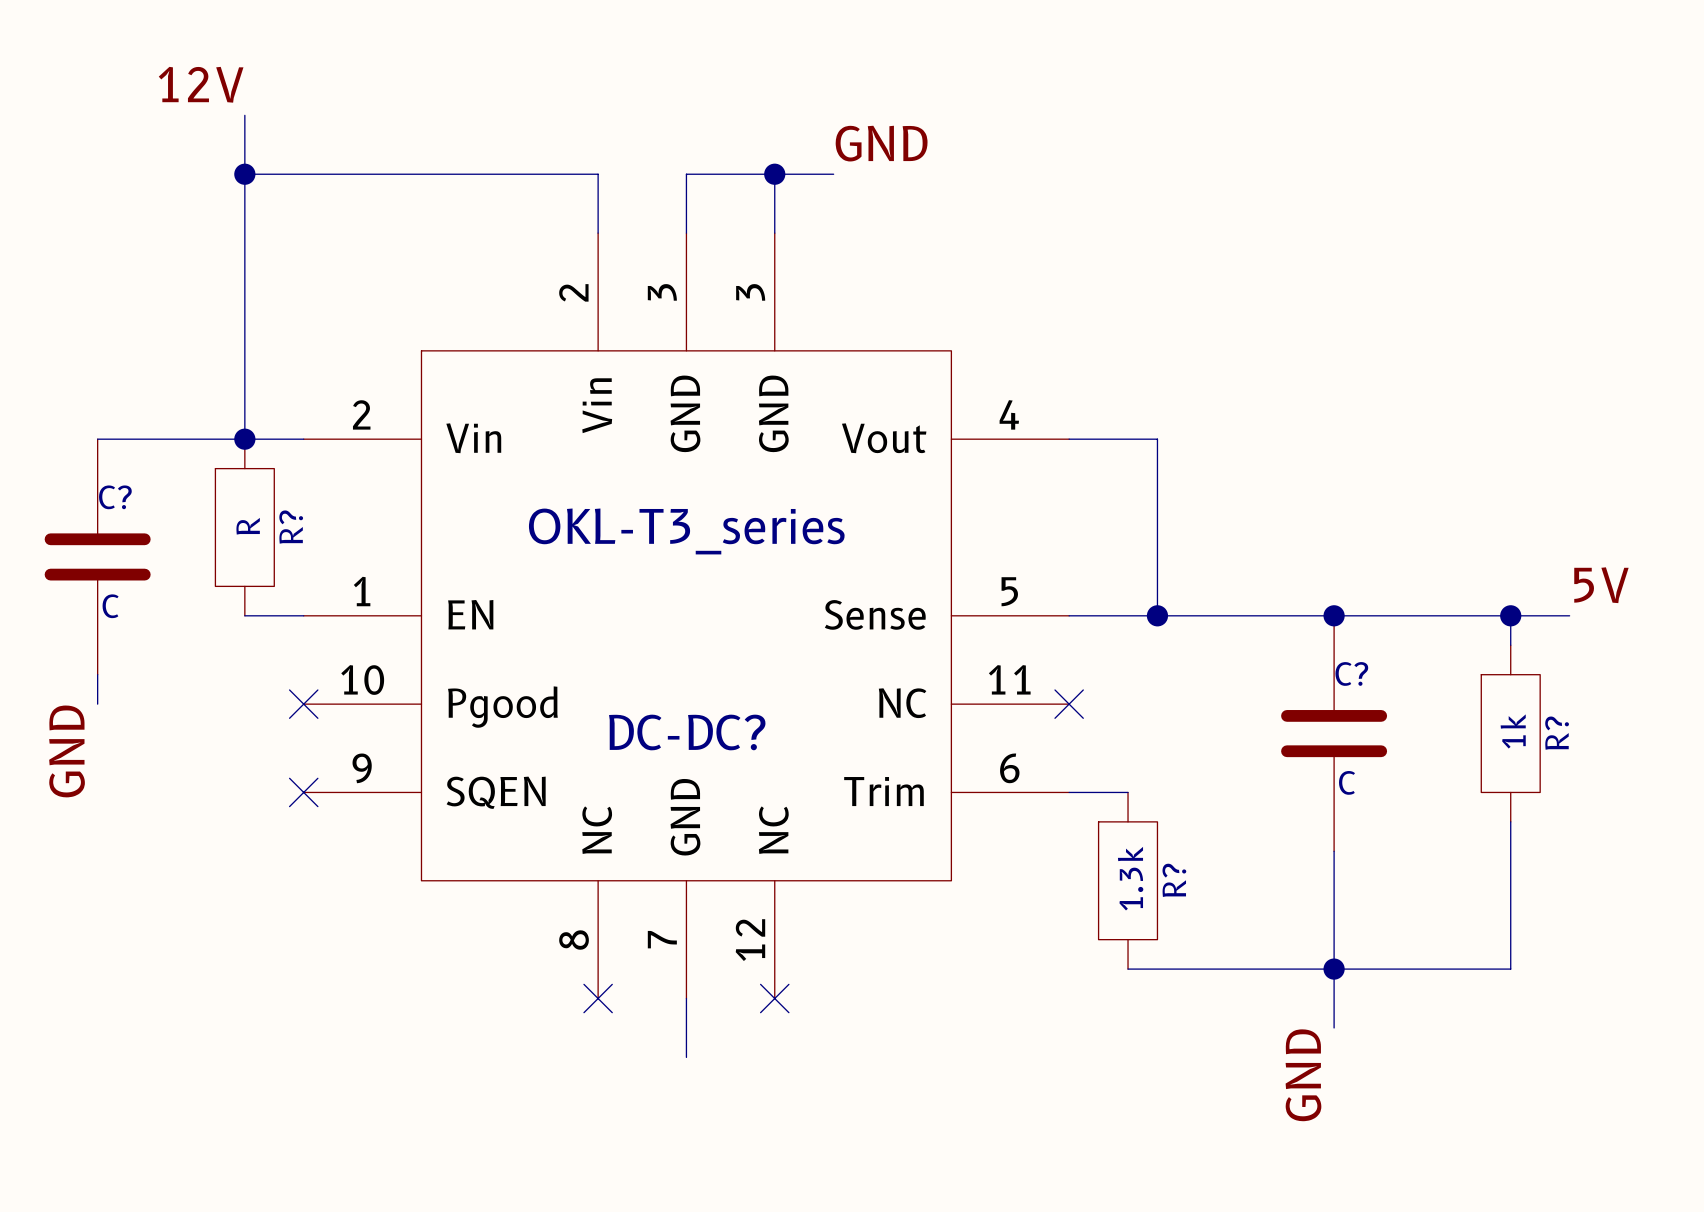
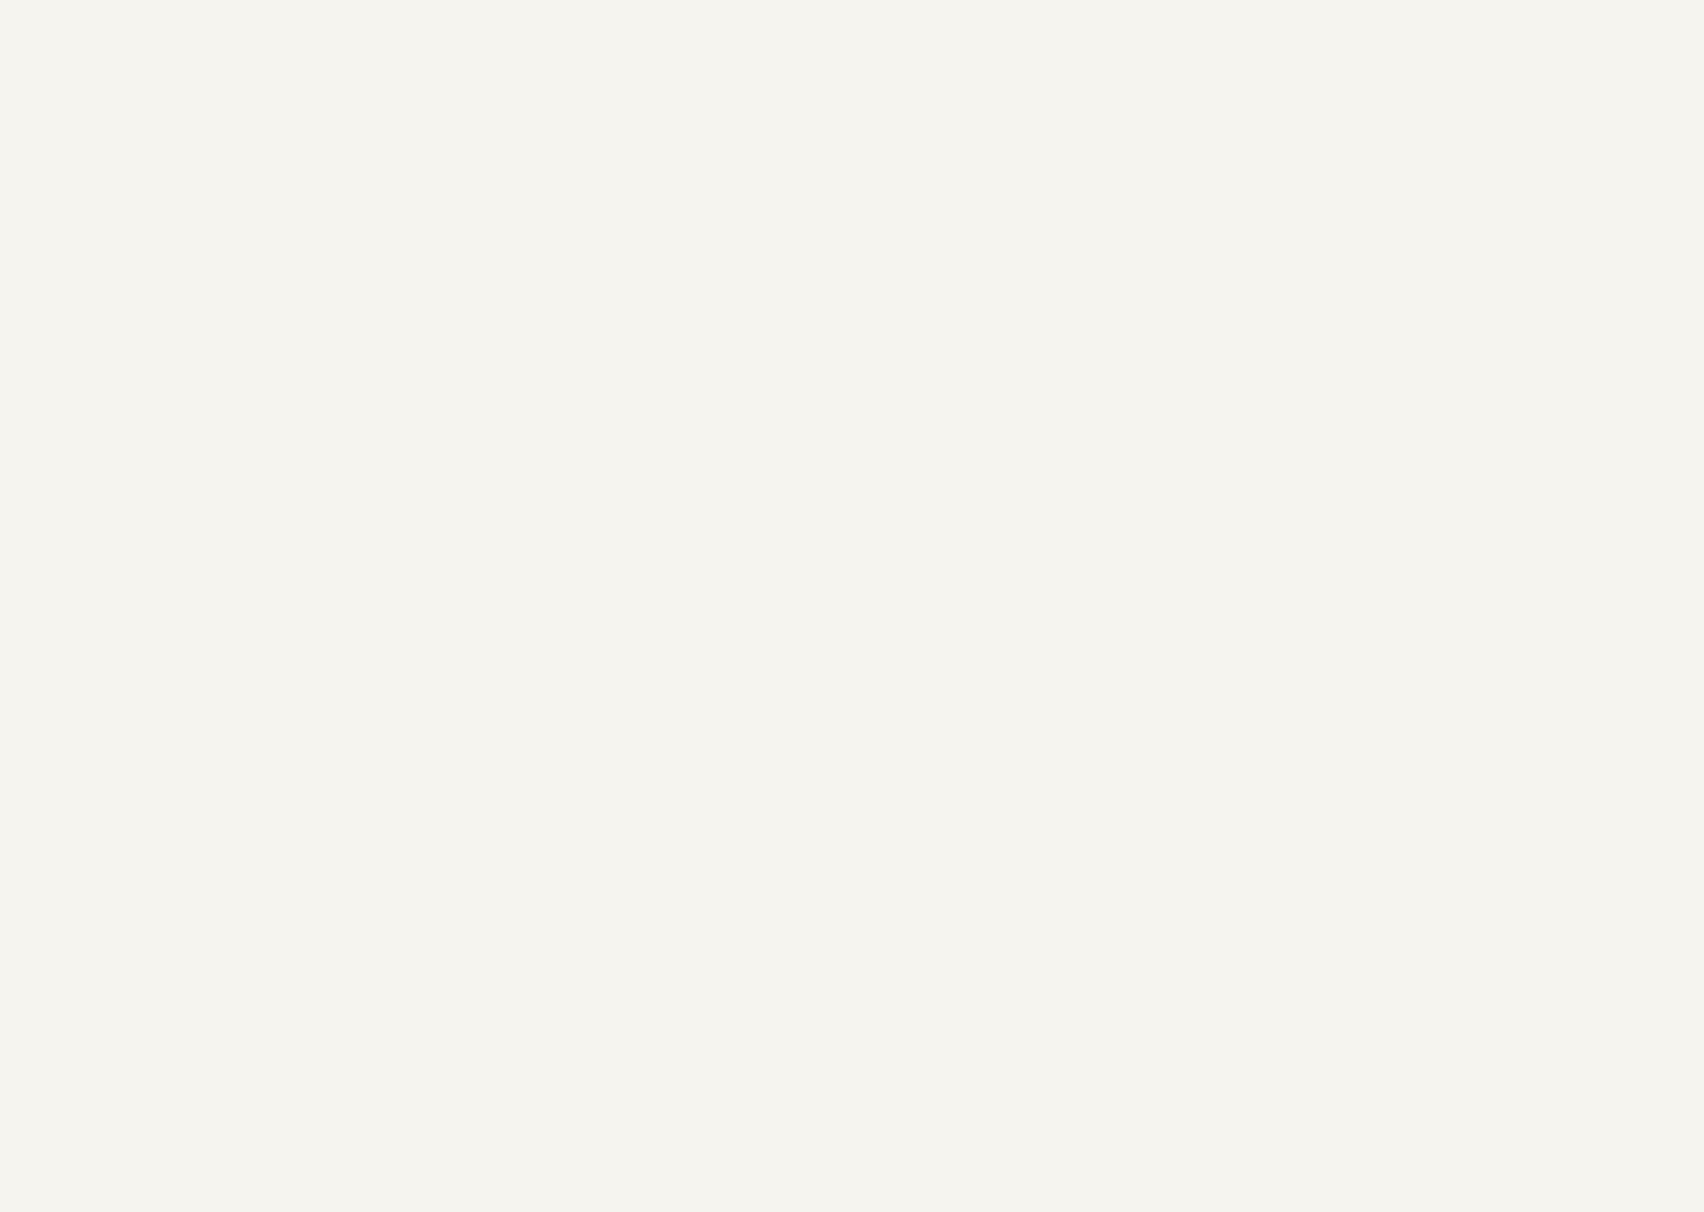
label: 12V (201, 84) -> none
wire: (244, 115) (244, 439) -> none
label: GND (881, 143) -> none
wire: (244, 174) (598, 174) (598, 233) -> none
junction: (244, 174) -> none
wire: (774, 174) (774, 233) -> none
junction: (774, 174) -> none
wire: (833, 174) (686, 174) (686, 233) -> none
wire: (97, 439) (303, 439) -> none
junction: (244, 439) -> none
wire: (1069, 439) (1157, 439) (1157, 615) -> none
R?: R (244, 527) -> none
C?: C (97, 556) -> none
label: 5V (1601, 585) -> none
wire: (244, 615) (303, 615) -> none
DC-DC?: OKL-T3_series (686, 615) -> none
wire: (1069, 615) (1569, 615) -> none
junction: (1157, 615) -> none
junction: (1334, 615) -> none
wire: (1510, 615) (1510, 645) -> none
junction: (1510, 615) -> none
wire: (97, 674) (97, 704) -> none
no-connect mark: (303, 704) -> none
no-connect mark: (1069, 704) -> none
C?: C (1334, 733) -> none
R?: 1k (1510, 733) -> none
label: GND (67, 751) -> none
no-connect mark: (303, 792) -> none
wire: (1069, 792) (1128, 792) -> none
wire: (1510, 821) (1510, 969) (1128, 969) -> none
wire: (1334, 851) (1334, 1027) -> none
R?: 1.3k (1128, 880) -> none
junction: (1334, 969) -> none
no-connect mark: (598, 998) -> none
wire: (686, 998) (686, 1057) -> none
no-connect mark: (774, 998) -> none
label: GND (1303, 1075) -> none

